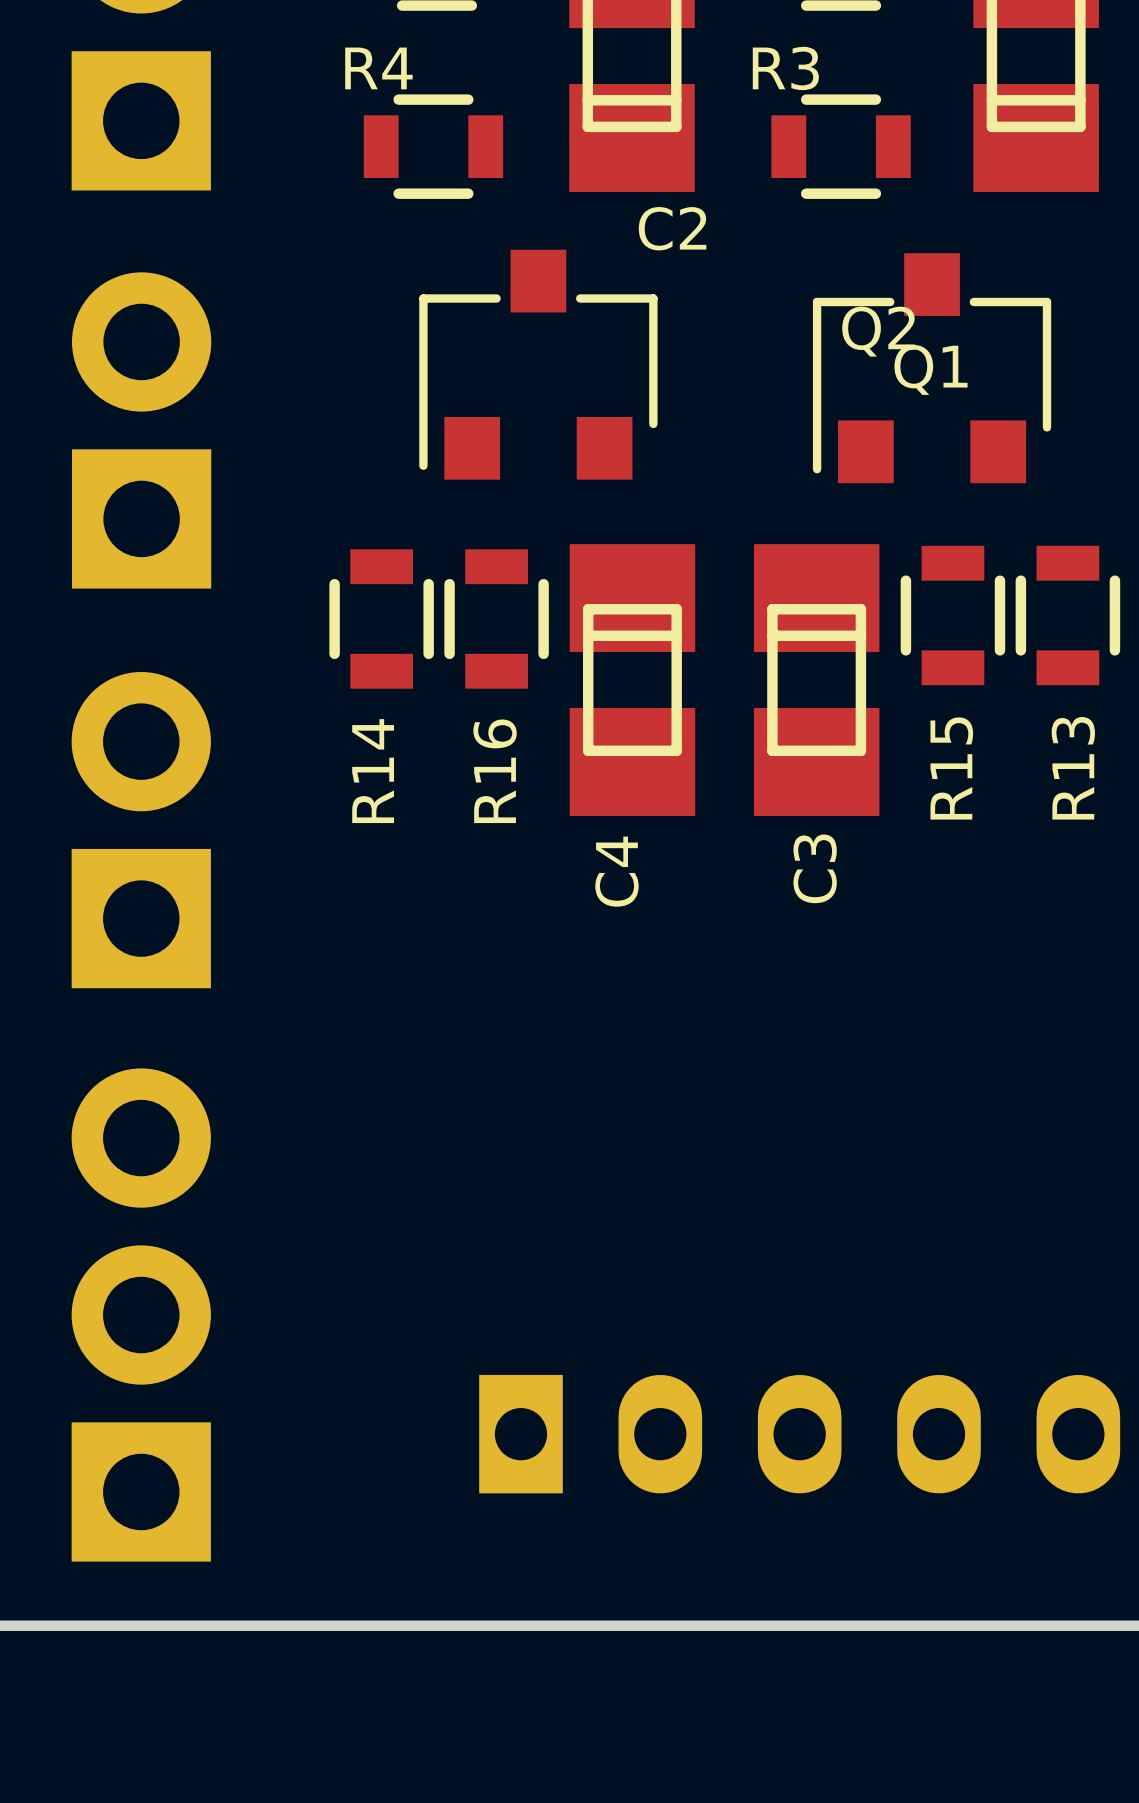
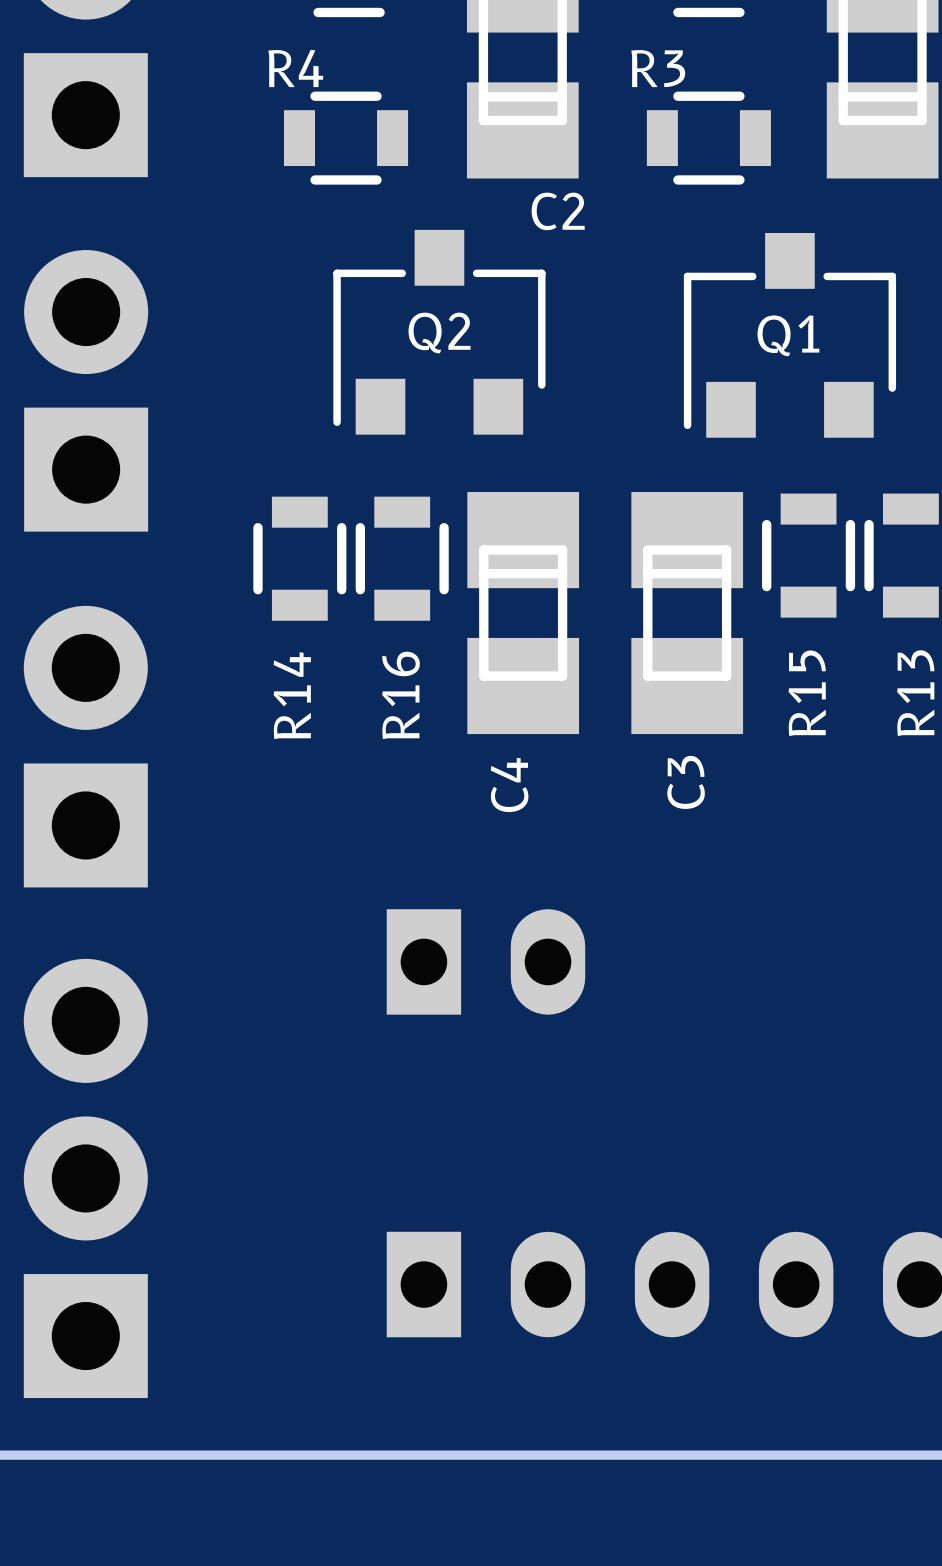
Q2 name position: Q2 (878, 331) -> Q2 (439, 332)
part: none -> (485, 961)

